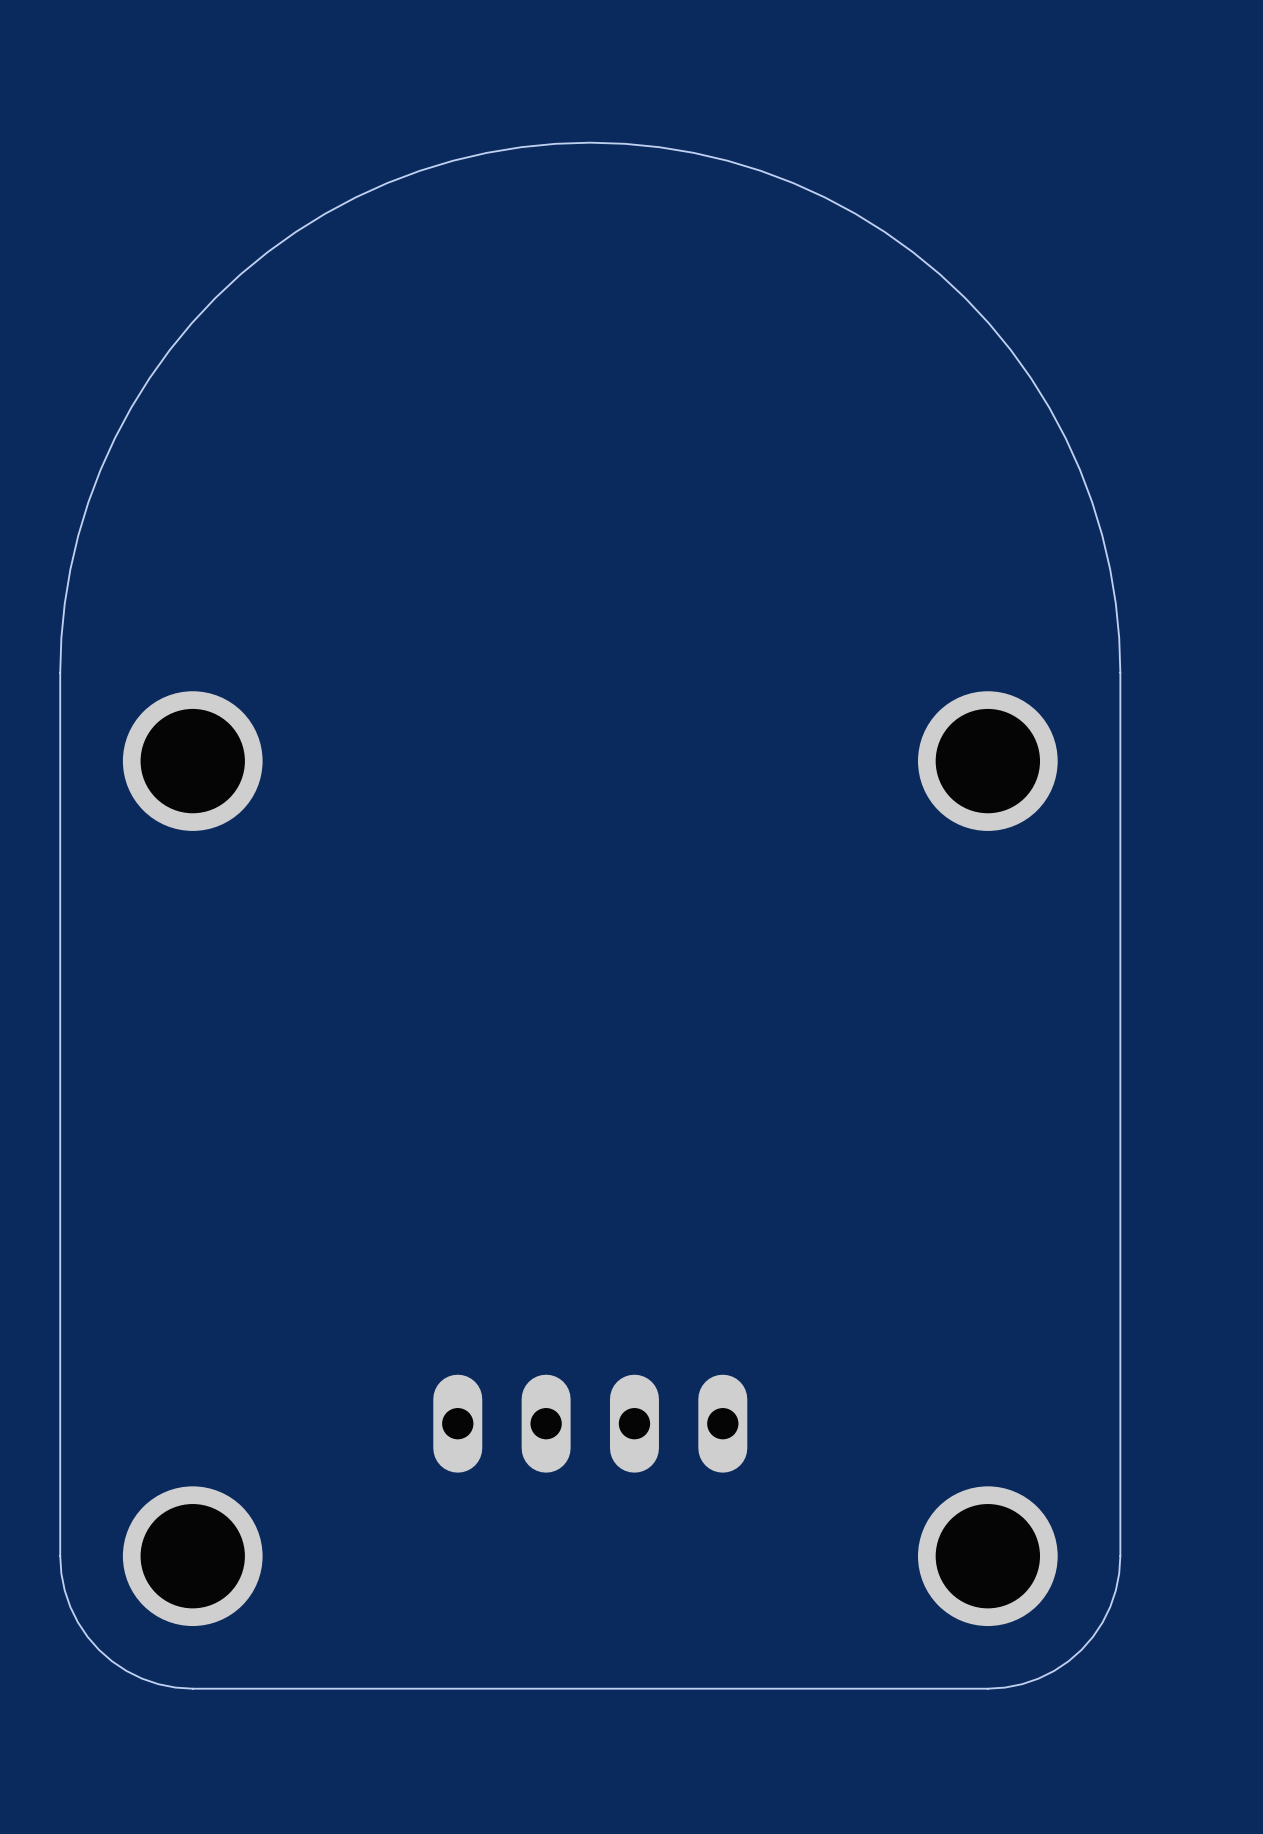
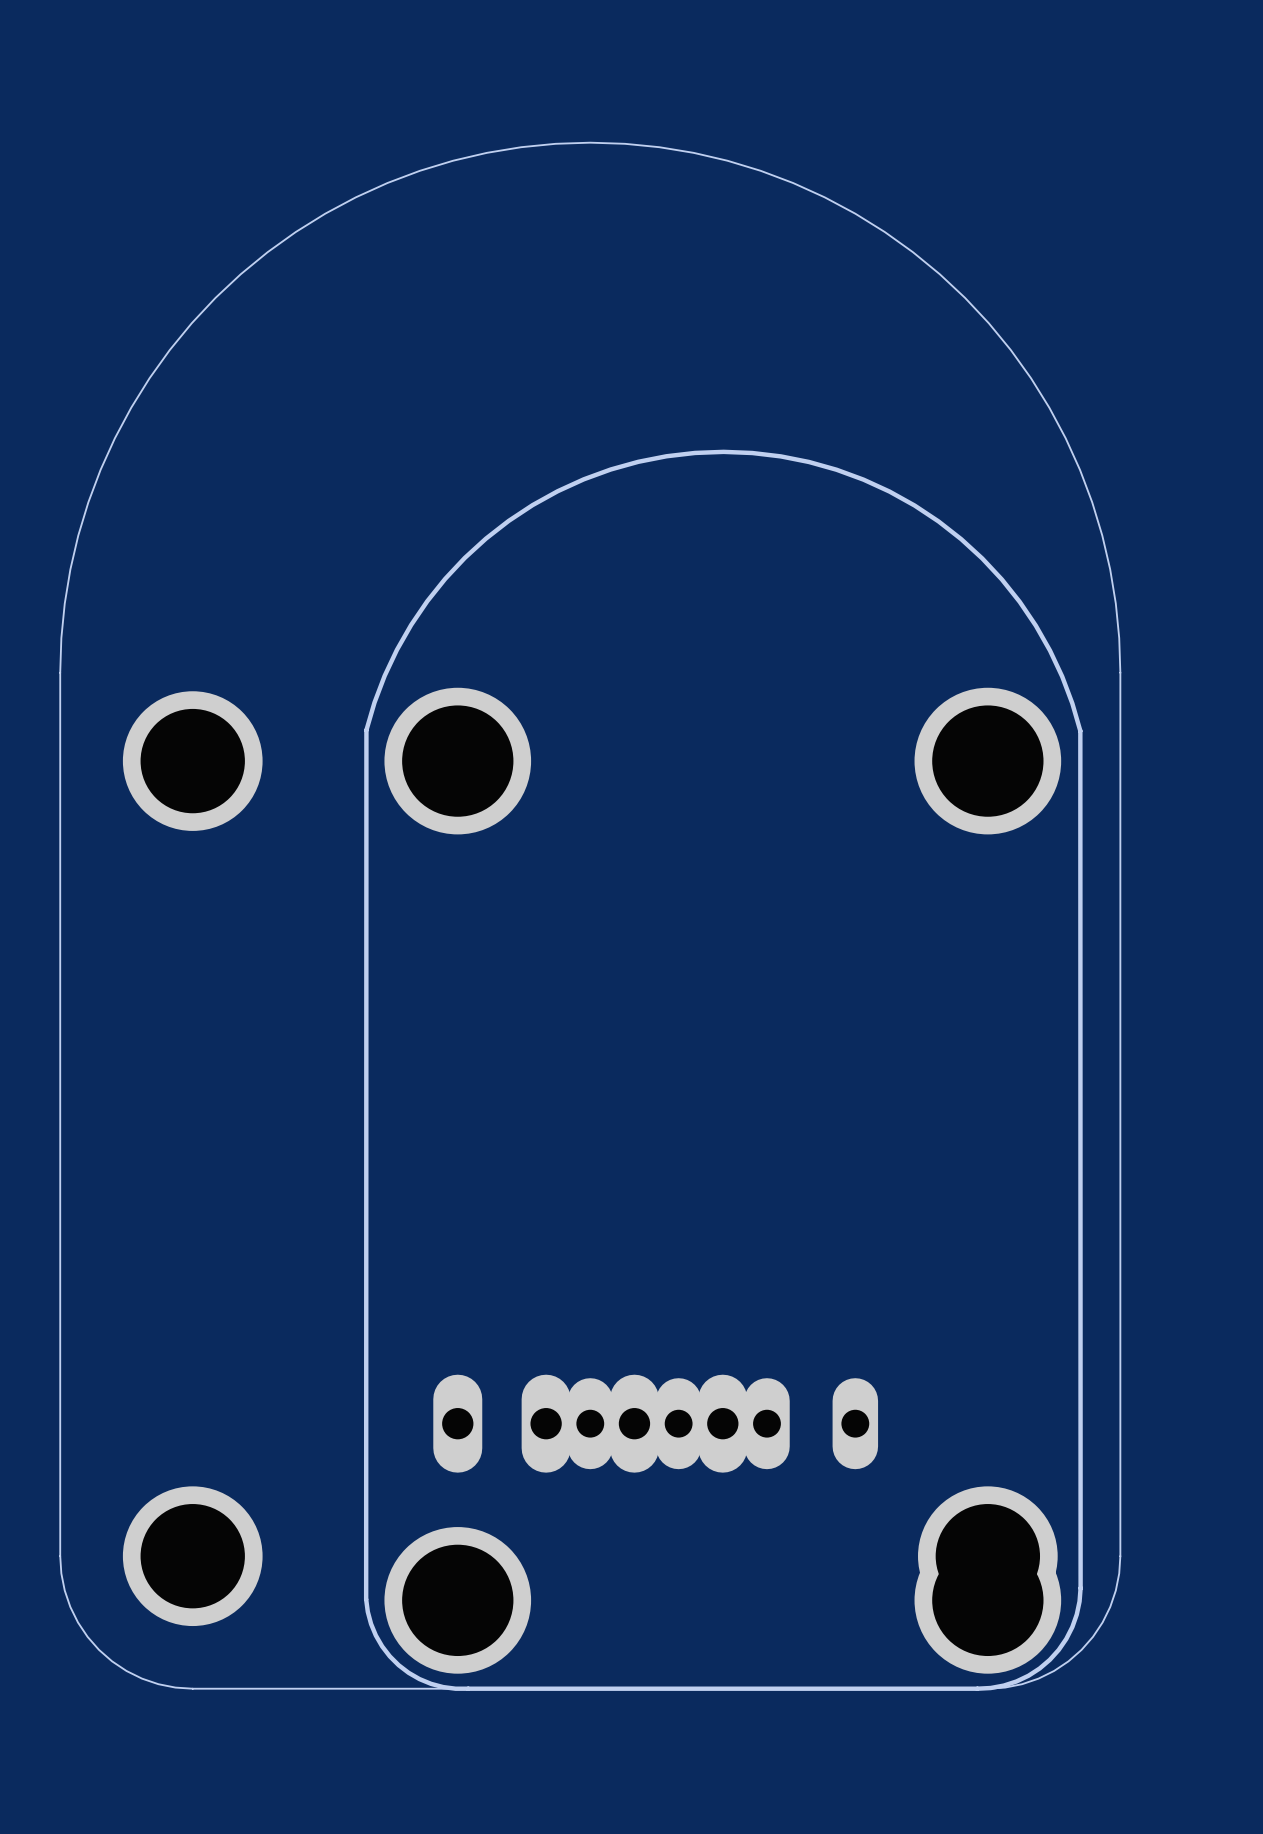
part: none -> (723, 1070)

